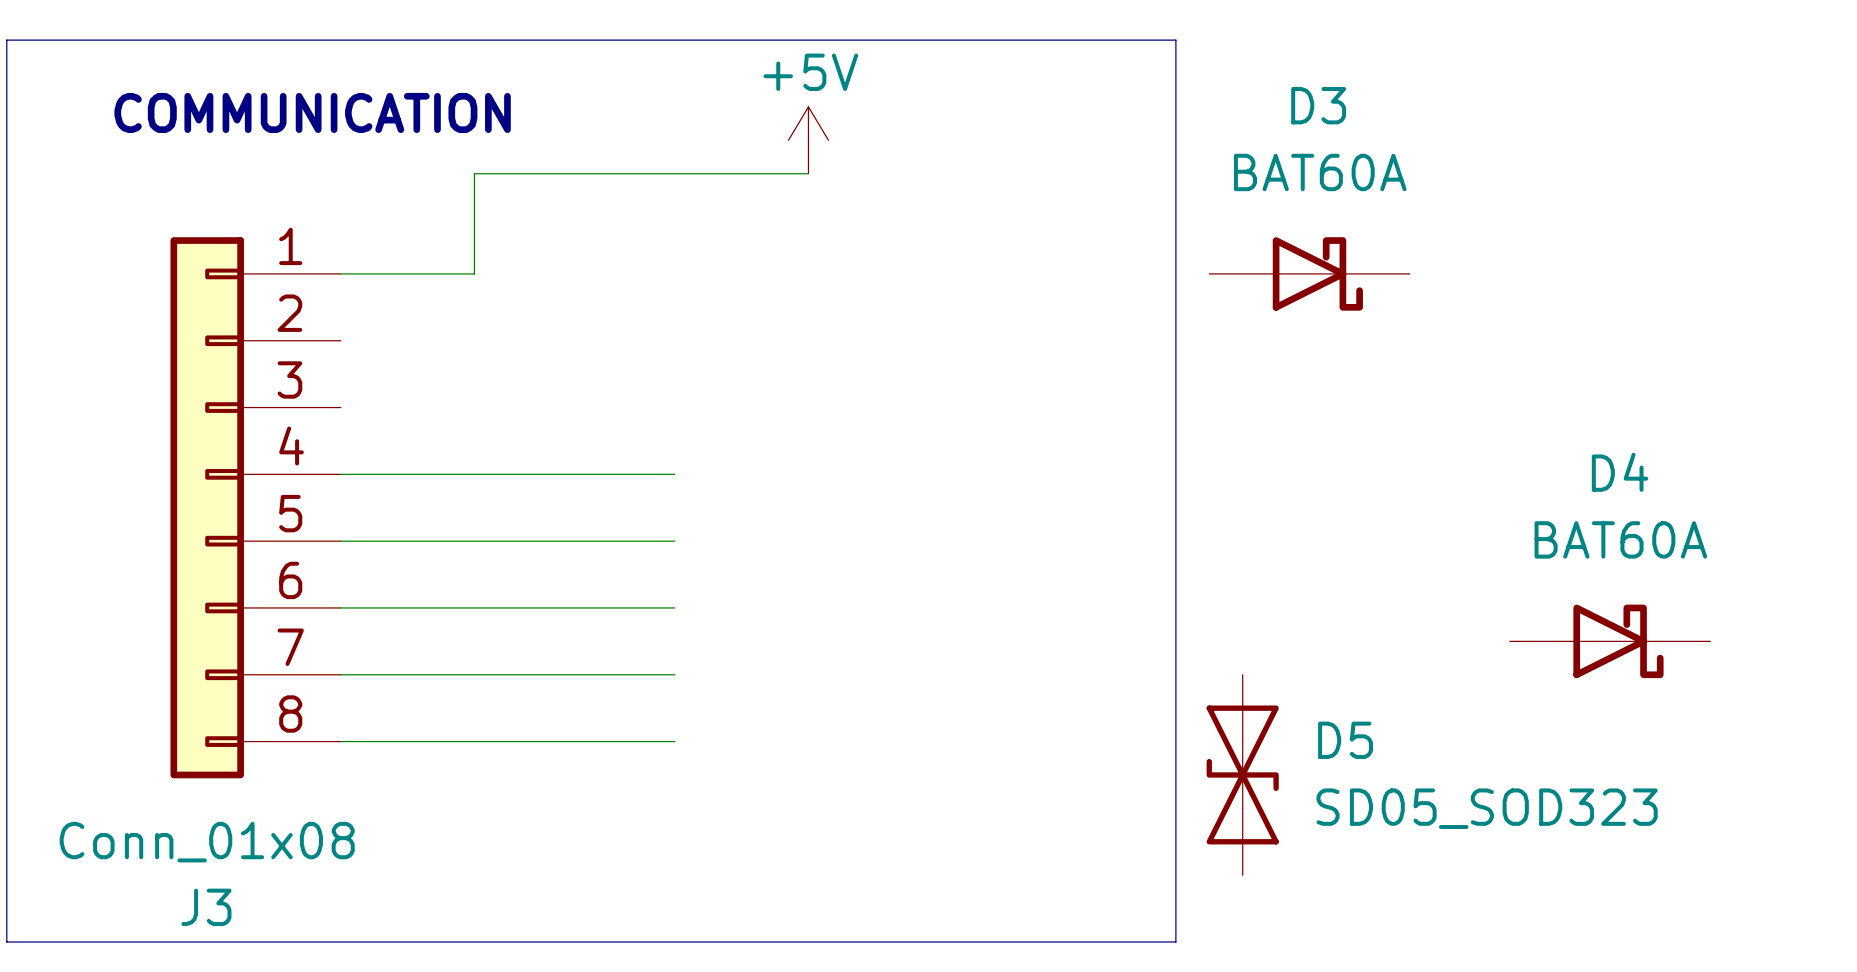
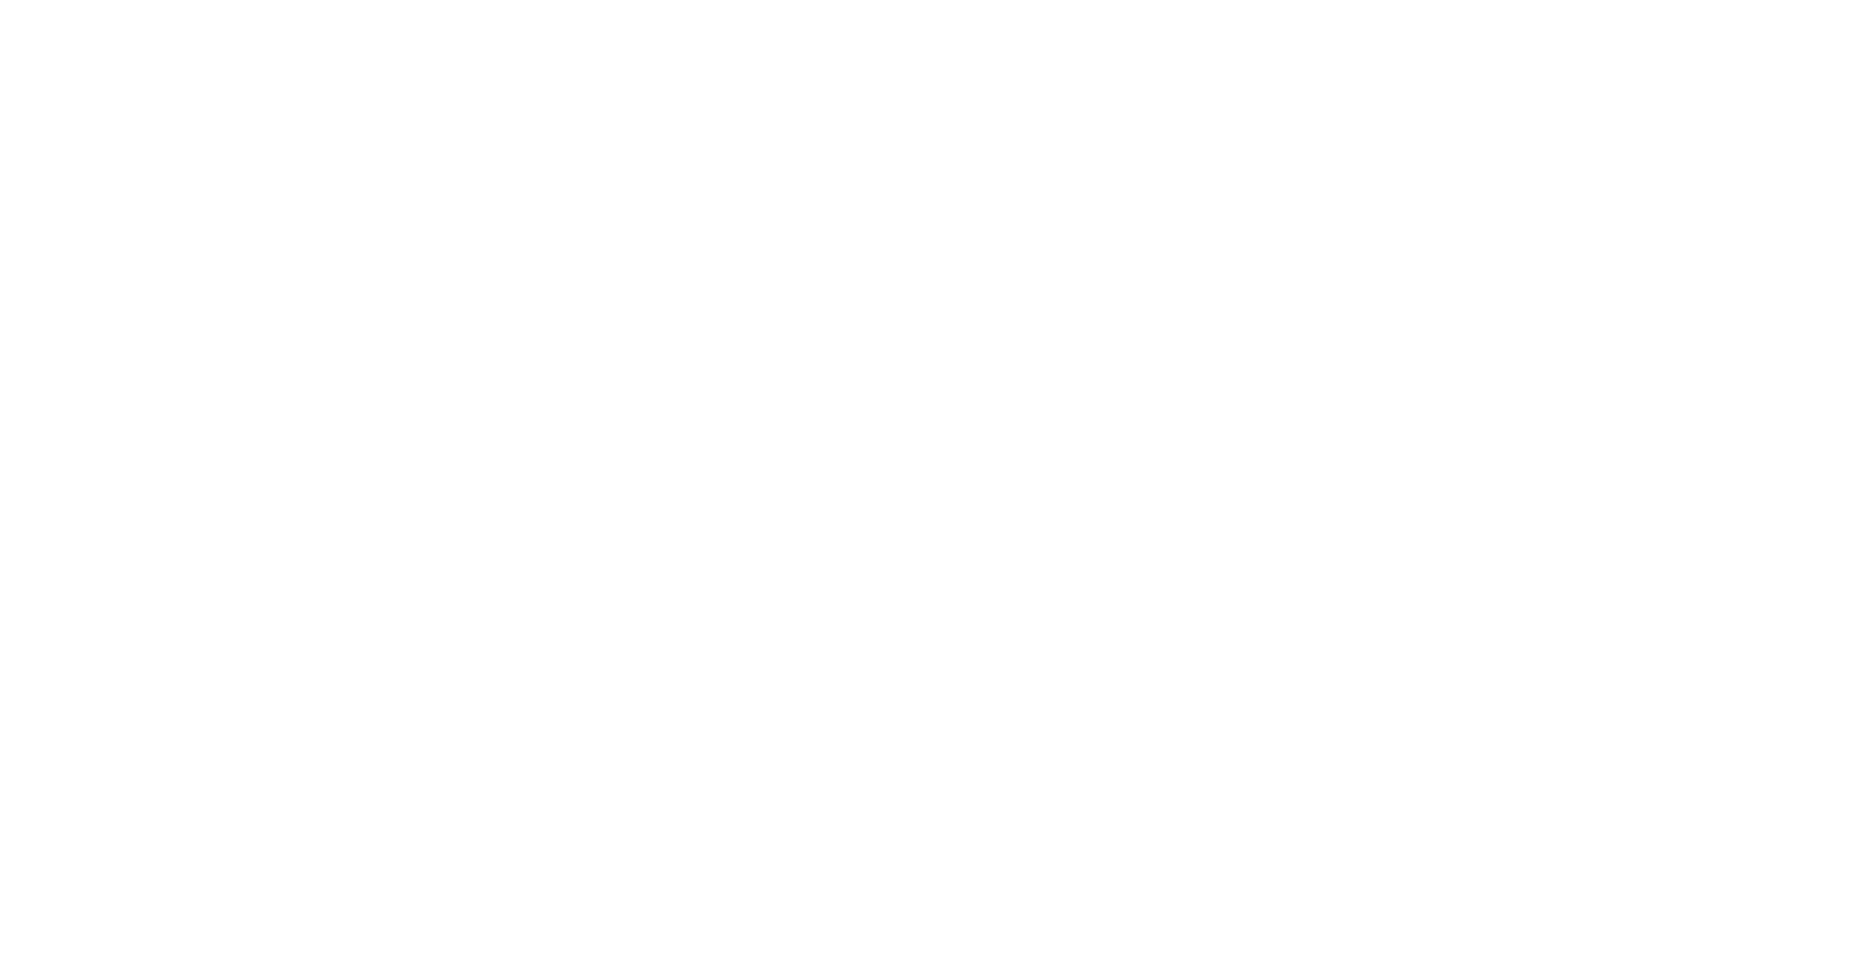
line: (6, 40) (6, 941) (1175, 941) (1175, 40) (6, 40) -> none
text: COMMUNICATION (312, 112) -> none
power symbol: +5V (808, 140) -> none
wire: (808, 173) (474, 173) (474, 273) (340, 273) -> none
D3: BAT60A (1309, 273) -> none
wire: (340, 474) (674, 474) -> none
J3: Conn_01x08 (255, 507) -> none
wire: (340, 541) (674, 541) -> none
wire: (340, 607) (674, 607) -> none
D4: BAT60A (1610, 641) -> none
wire: (340, 674) (674, 674) -> none
wire: (340, 741) (674, 741) -> none
D5: SD05_SOD323 (1242, 774) -> none

